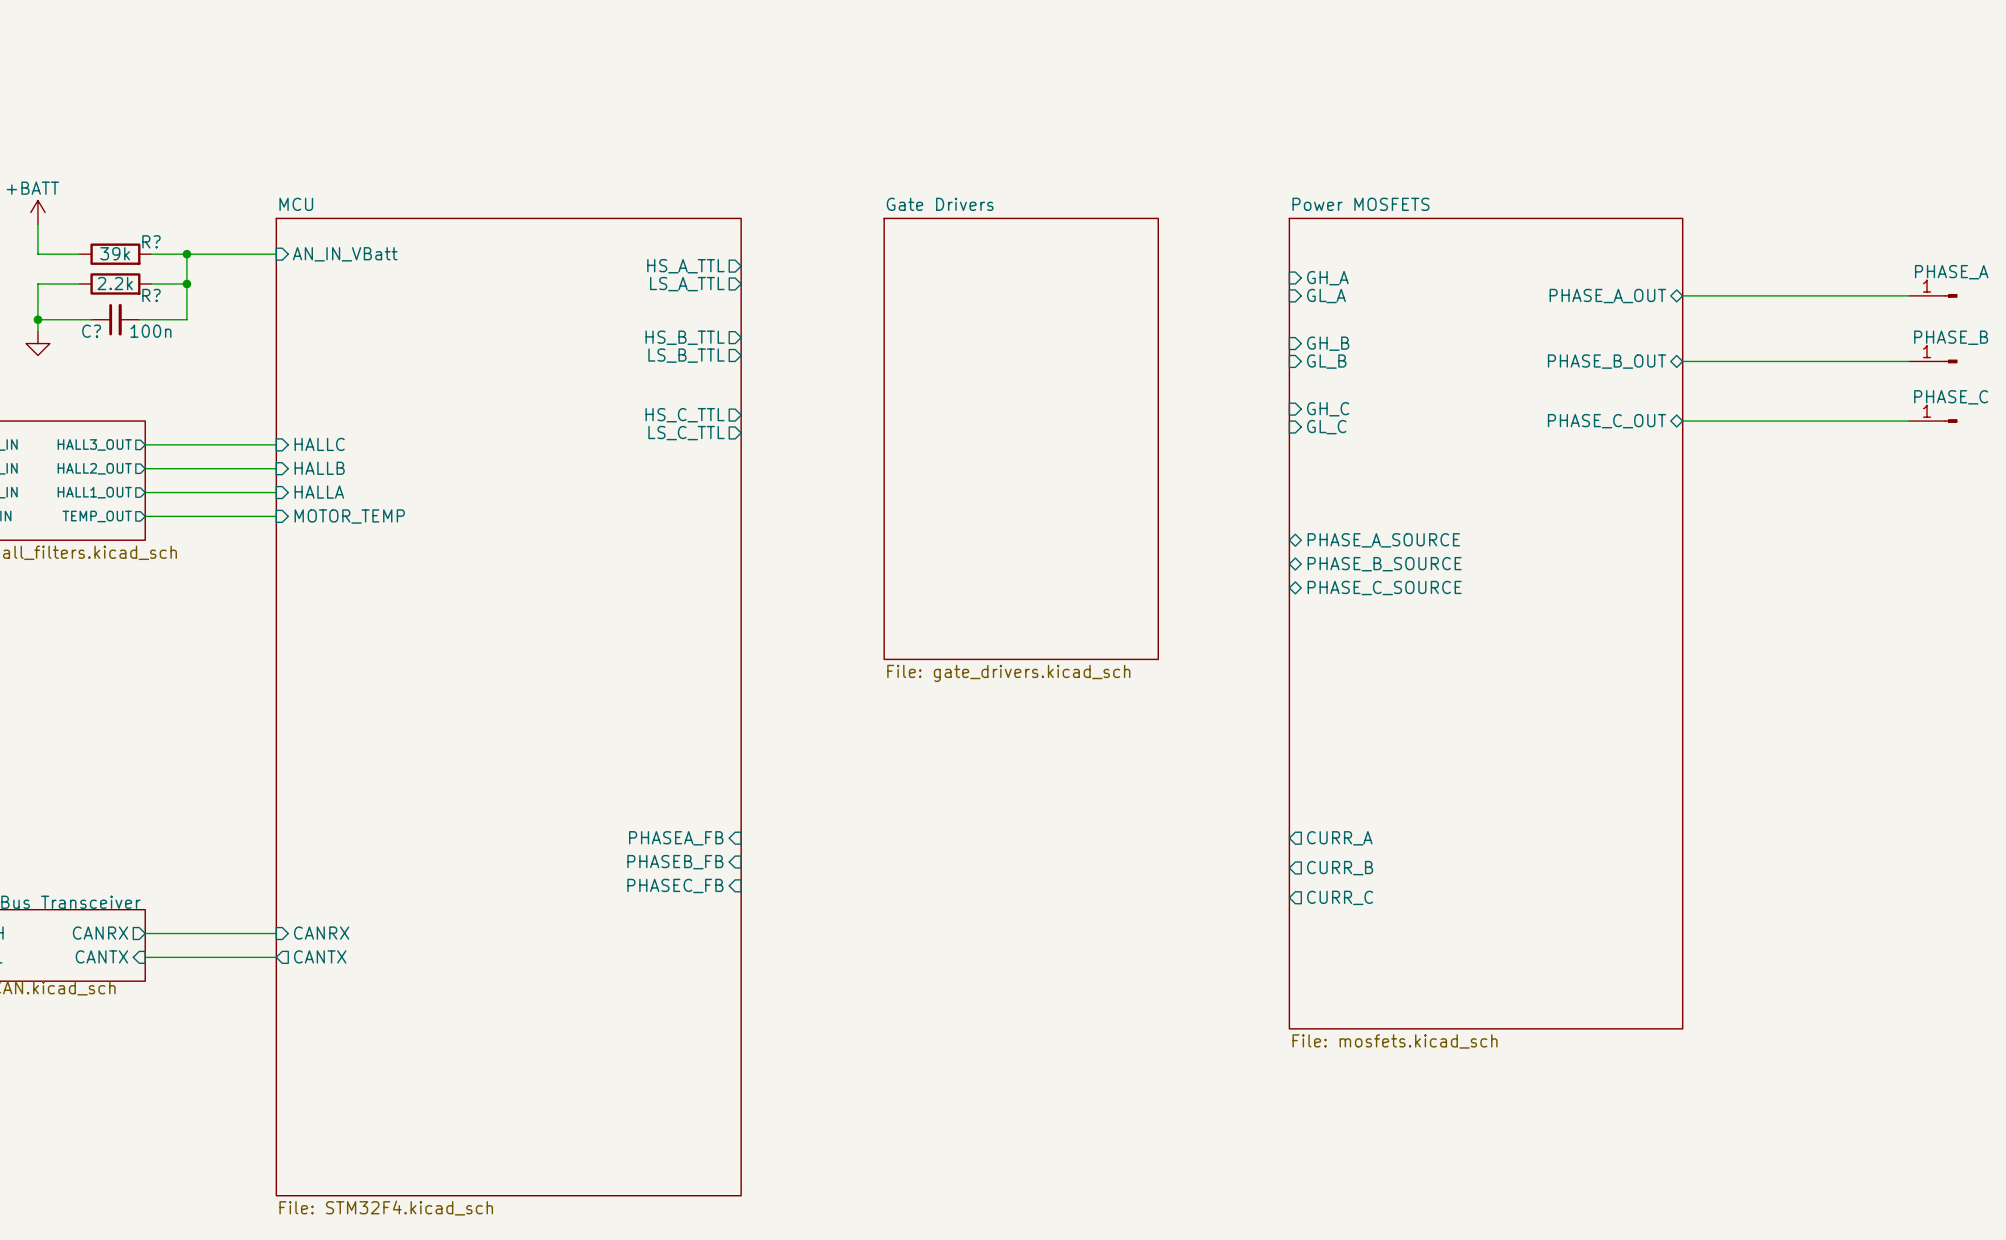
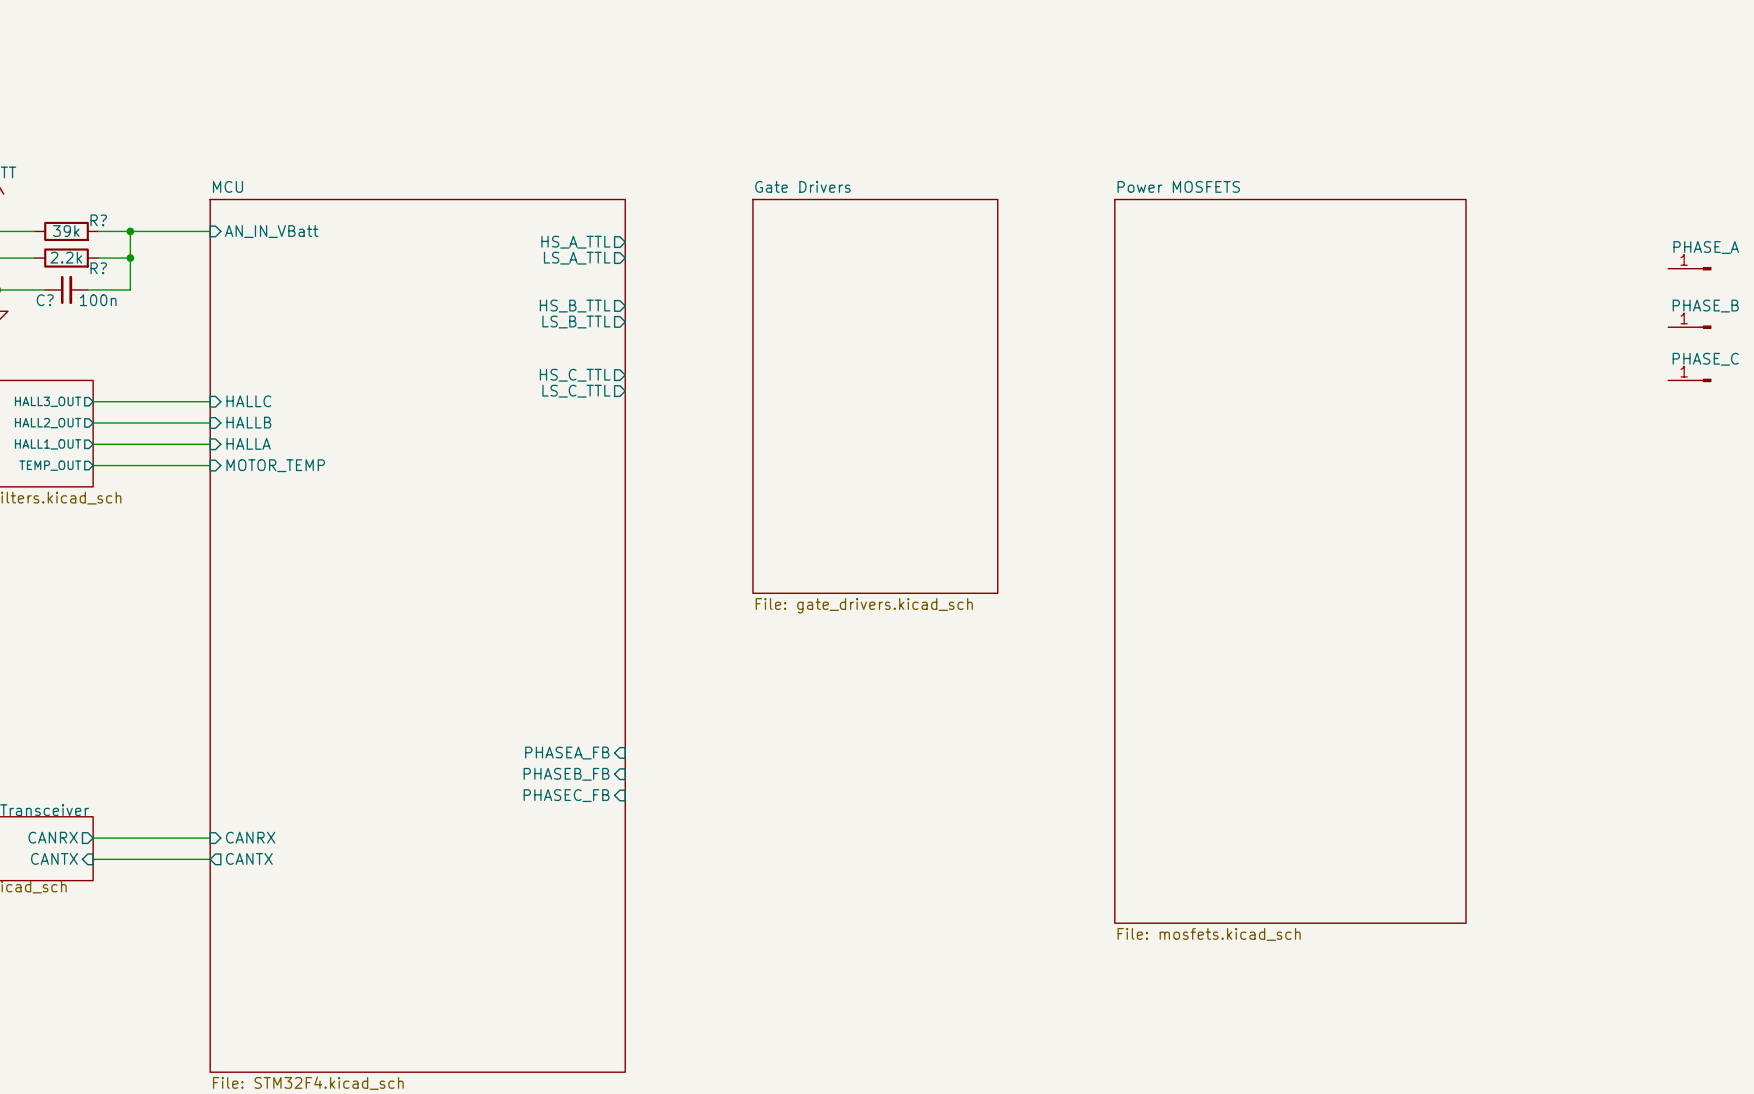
sheet pin: GH_A (1327, 278) -> none
wire: (1682, 295) (1909, 295) -> none
sheet pin: GL_A (1326, 296) -> none
sheet pin: PHASE_A_OUT (1607, 296) -> none
sheet pin: GH_B (1328, 343) -> none
sheet pin: GL_B (1326, 361) -> none
sheet pin: PHASE_B_OUT (1607, 361) -> none
wire: (1682, 361) (1909, 361) -> none
sheet pin: GH_C (1328, 409) -> none
sheet pin: PHASE_C_OUT (1607, 421) -> none
wire: (1682, 421) (1909, 421) -> none
sheet pin: GL_C (1326, 427) -> none
sheet pin: PHASE_A_SOURCE (1383, 540) -> none
sheet pin: PHASE_B_SOURCE (1384, 564) -> none
sheet pin: PHASE_C_SOURCE (1384, 588) -> none
sheet pin: CURR_A (1339, 838) -> none
sheet pin: CURR_B (1340, 868) -> none
sheet pin: CURR_C (1340, 897) -> none

